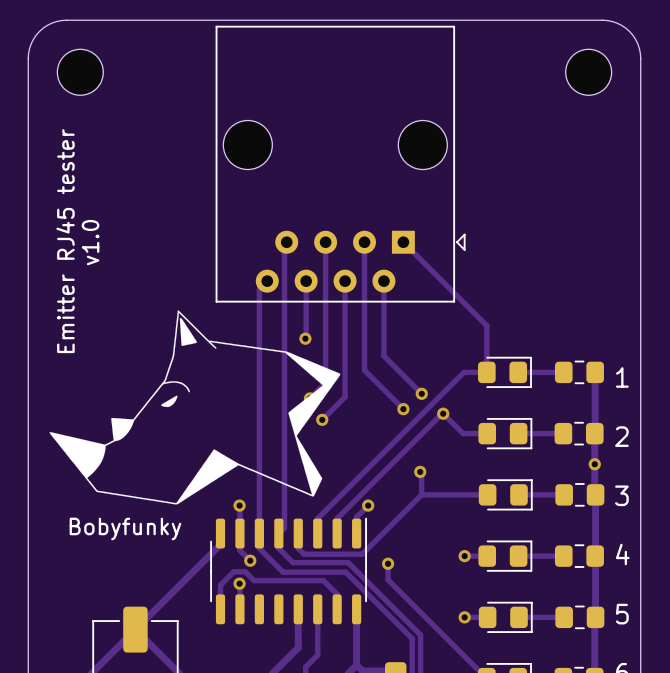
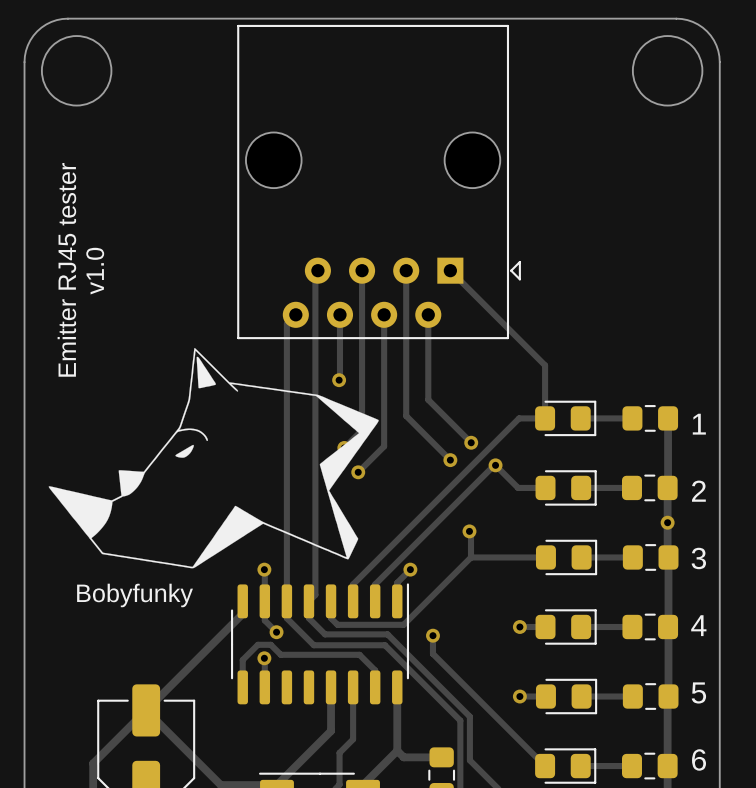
round board edge: none -> [41, 35, 112, 106]
round board edge: none -> [632, 35, 703, 106]
part: (80, 72) -> none
part: (588, 72) -> none

